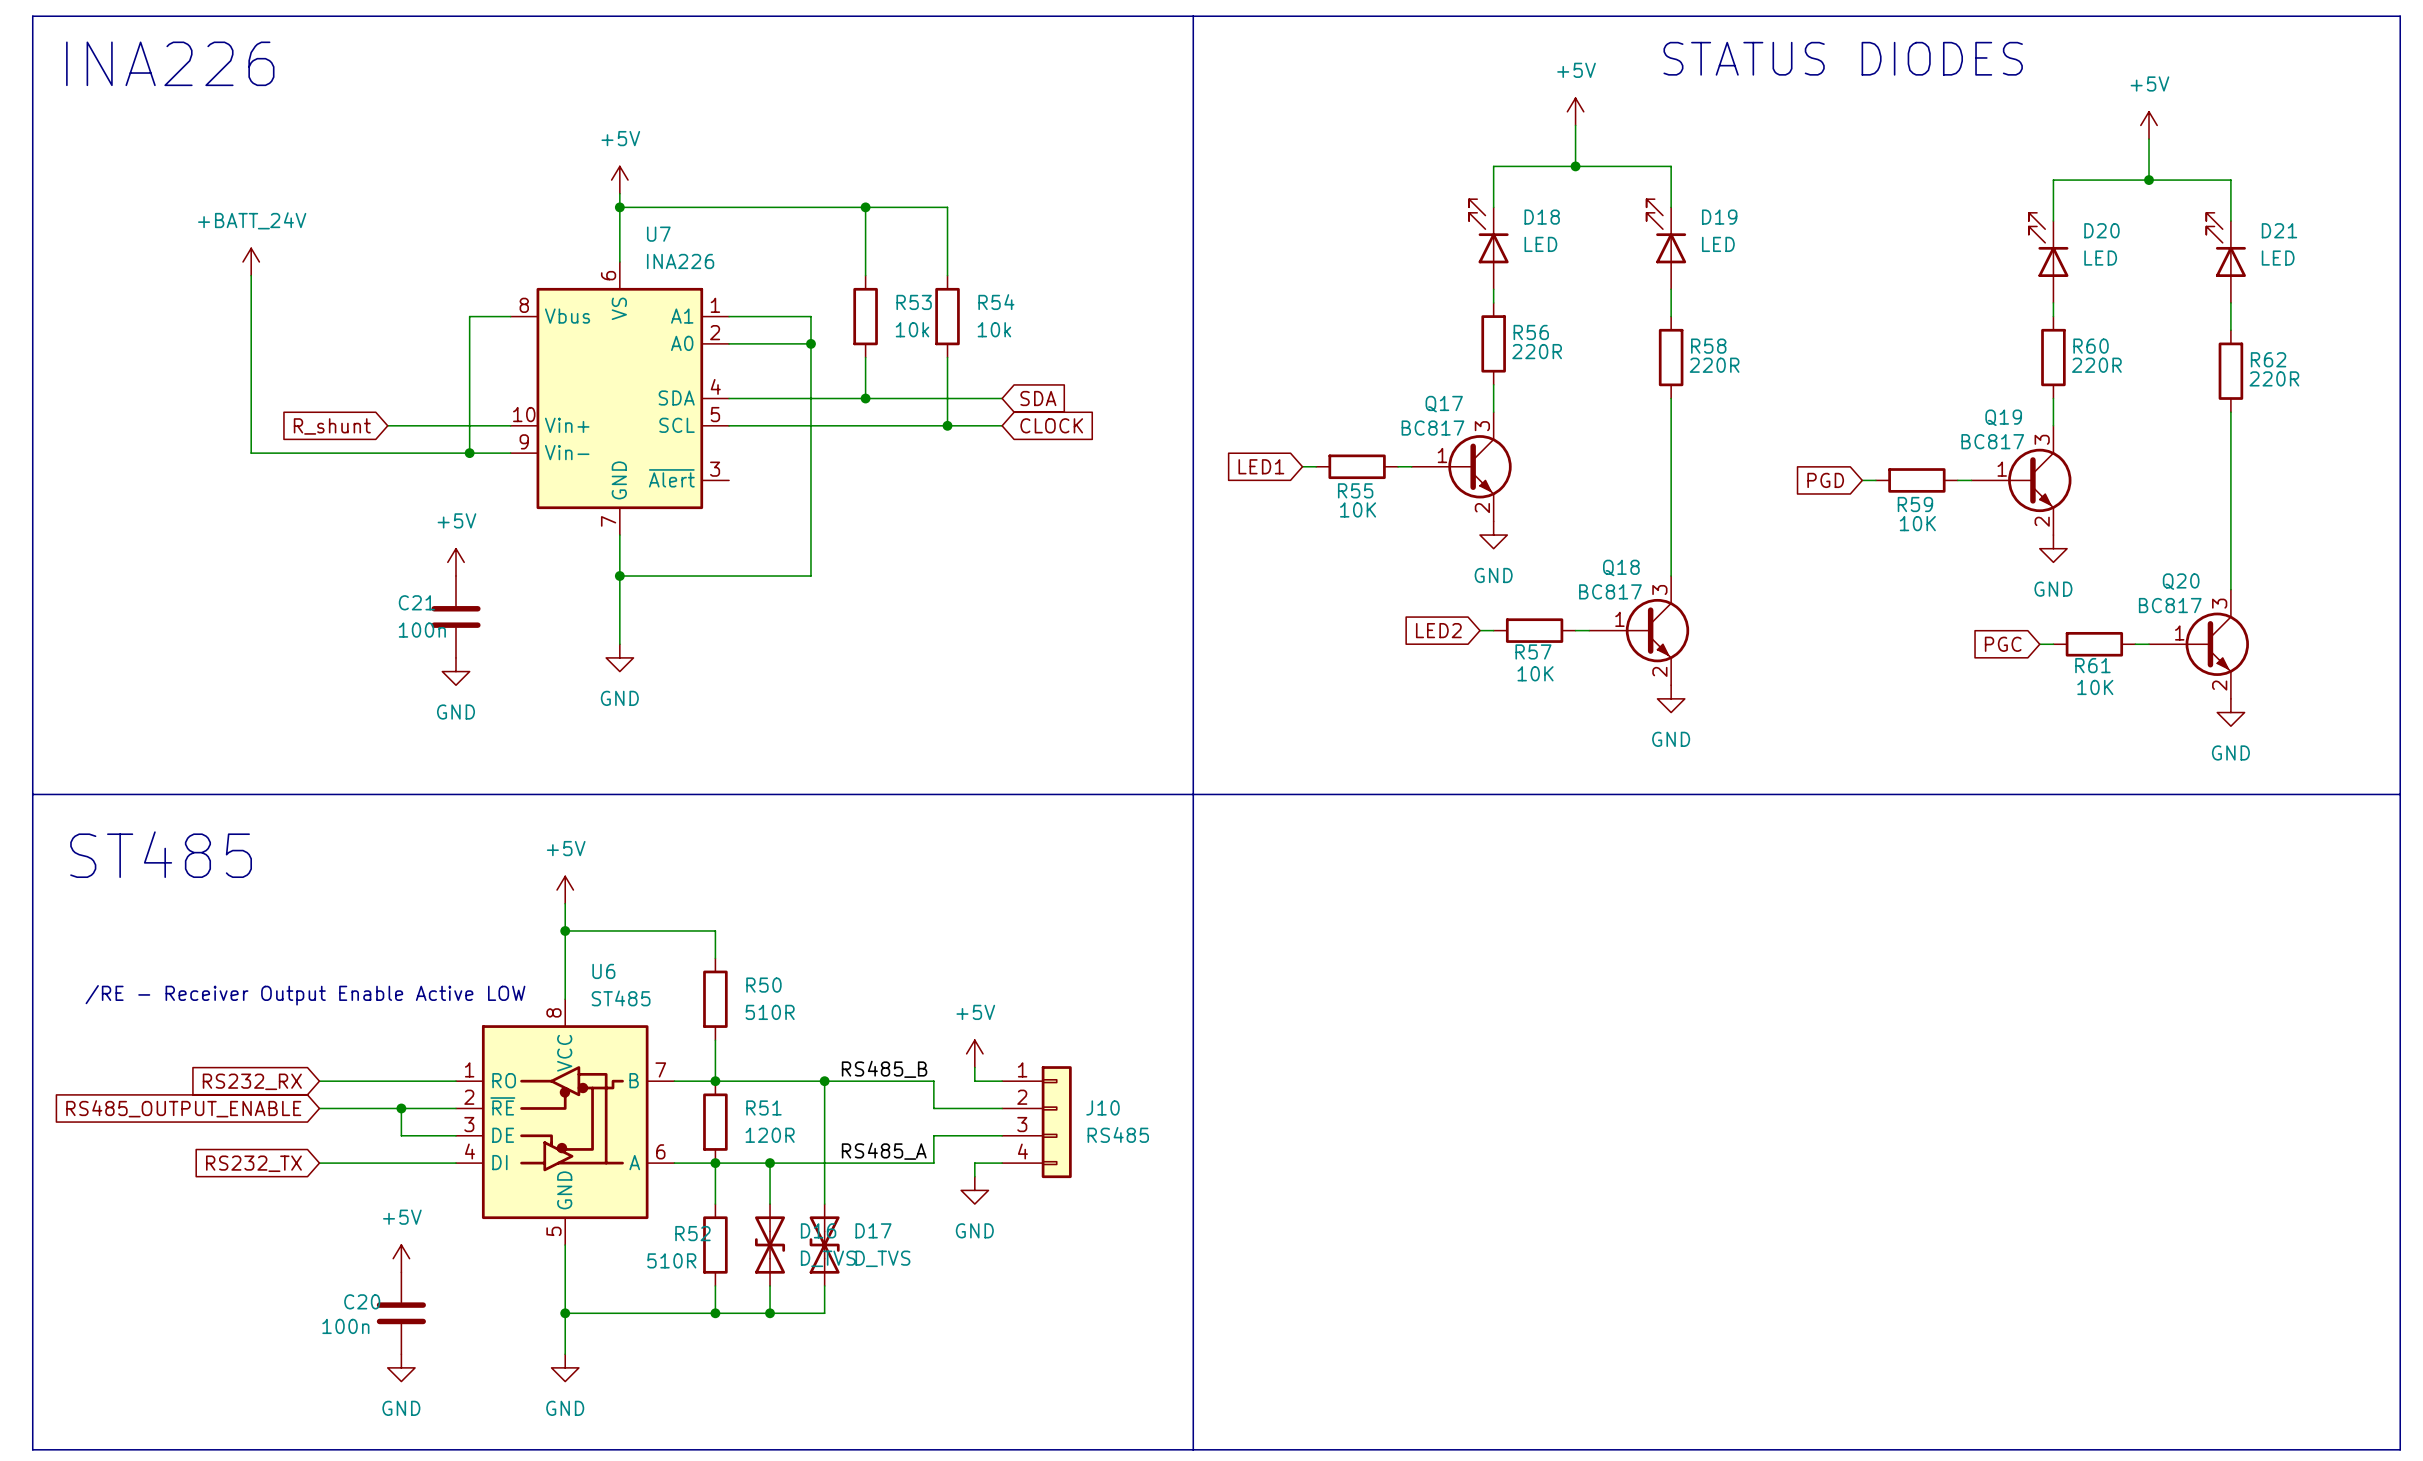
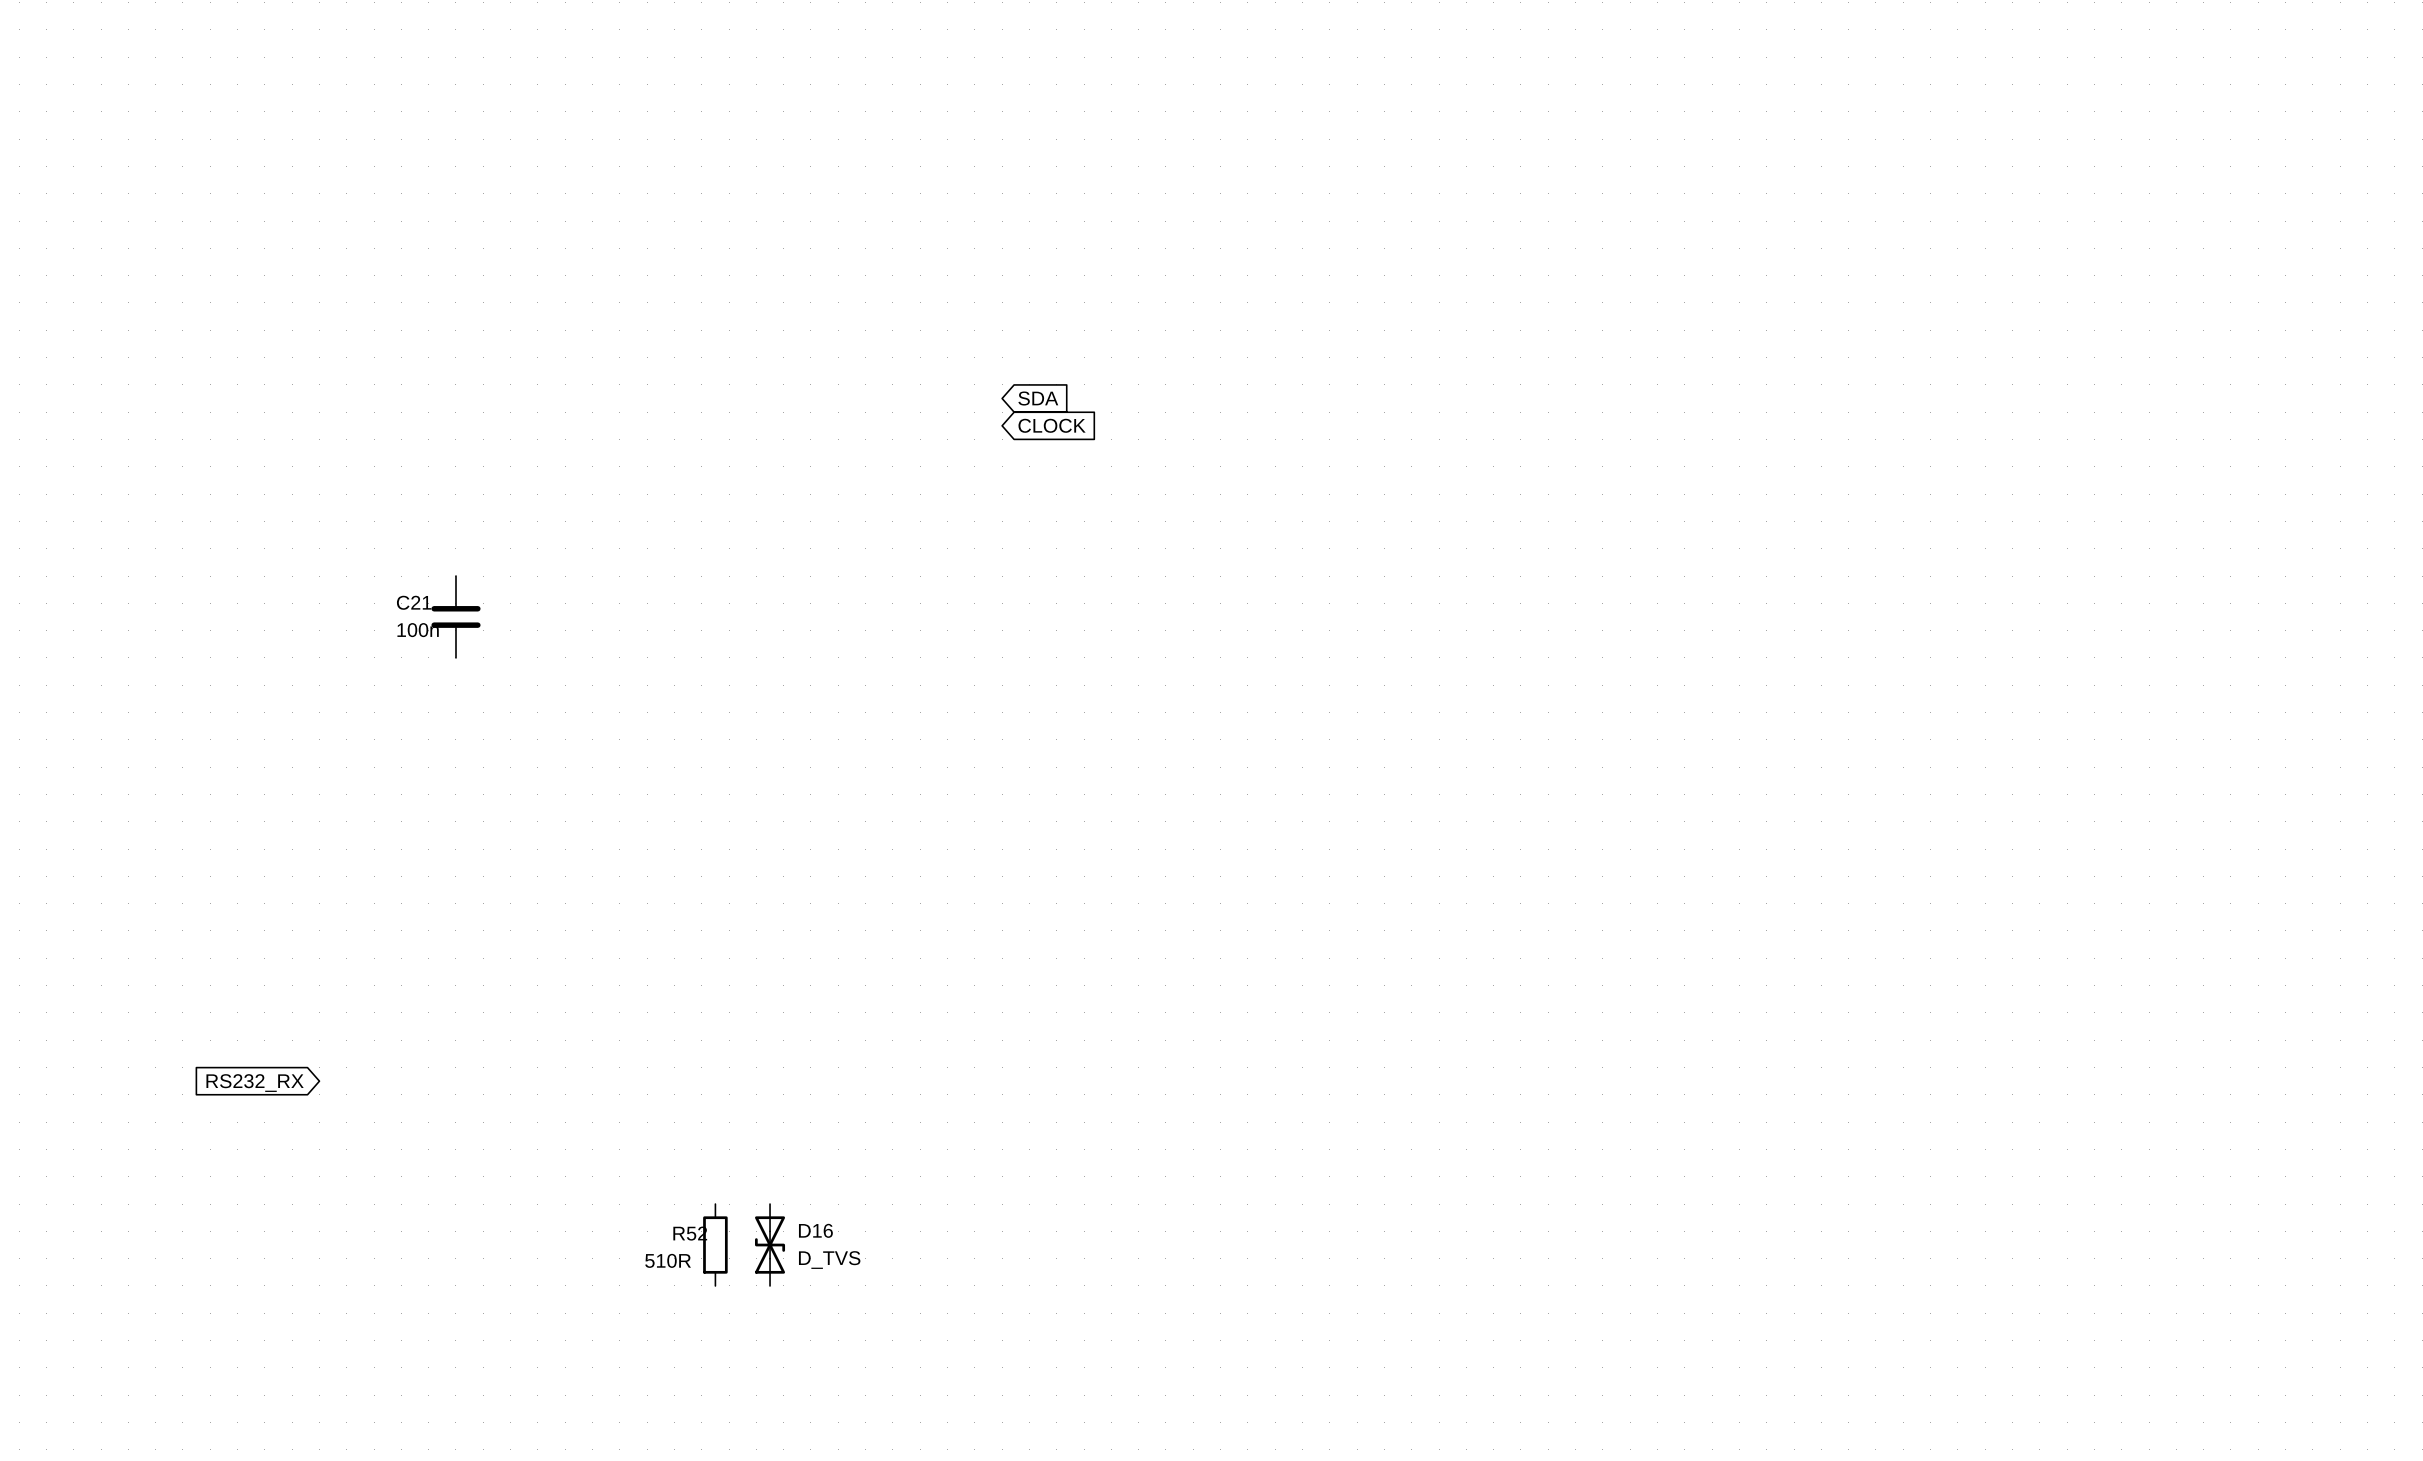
line: (32, 16) (32, 1449) (2400, 1449) (2400, 16) (32, 16) -> none
line: (1193, 16) (1193, 1449) -> none
text: STATUS DIODES (1843, 58) -> none
text: INA226 (170, 63) -> none
power symbol: +5V (1575, 111) -> none
wire: (1575, 125) (1575, 166) -> none
power symbol: +5V (2149, 125) -> none
wire: (2149, 139) (2149, 180) -> none
junction: (1575, 166) -> none
power symbol: +5V (619, 180) -> none
junction: (2149, 180) -> none
wire: (619, 193) (619, 261) -> none
wire: (619, 207) (947, 207) (947, 275) -> none
junction: (619, 207) -> none
wire: (865, 207) (865, 275) -> none
junction: (865, 207) -> none
wire: (1493, 207) (1493, 166) (1671, 166) (1671, 207) -> none
wire: (2053, 221) (2053, 180) (2230, 180) (2230, 221) -> none
D18: LED (1488, 244) -> none
D19: LED (1666, 244) -> none
D20: LED (2048, 257) -> none
D21: LED (2226, 257) -> none
power symbol: +BATT_24V (251, 261) -> none
wire: (251, 275) (251, 453) (510, 453) -> none
wire: (1493, 289) (1493, 302) -> none
wire: (1671, 289) (1671, 316) -> none
wire: (2053, 302) (2053, 316) -> none
wire: (2230, 302) (2230, 330) -> none
wire: (510, 316) (469, 316) (469, 453) -> none
wire: (729, 316) (810, 316) (810, 576) (619, 576) -> none
R53: 10k (865, 316) -> none
R54: 10k (947, 316) -> none
wire: (729, 343) (810, 343) -> none
junction: (810, 343) -> none
R56: 220R (1493, 343) -> none
wire: (865, 357) (865, 398) -> none
wire: (947, 357) (947, 425) -> none
R58: 220R (1671, 357) -> none
R60: 220R (2053, 357) -> none
R62: 220R (2230, 371) -> none
wire: (1493, 384) (1493, 412) -> none
U7: INA226 (619, 398) -> none
wire: (729, 398) (1002, 398) -> none
junction: (865, 398) -> none
wire: (1671, 398) (1671, 576) -> none
wire: (2053, 398) (2053, 425) -> none
wire: (2230, 412) (2230, 589) -> none
wire: (387, 425) (510, 425) -> none
wire: (729, 425) (1002, 425) -> none
junction: (947, 425) -> none
global label: R_shunt (332, 426) -> none
junction: (469, 453) -> none
global label: LED1 (1261, 466) -> none
wire: (1302, 466) (1316, 466) -> none
R55: 10K (1357, 466) -> none
wire: (1398, 466) (1411, 466) -> none
Q17: BC817 (1461, 466) -> none
global label: PGD (1825, 480) -> none
wire: (1862, 480) (1875, 480) -> none
R59: 10K (1916, 480) -> none
wire: (1957, 480) (1971, 480) -> none
Q19: BC817 (2021, 480) -> none
wire: (619, 535) (619, 644) -> none
power symbol: GND (1493, 535) -> none
power symbol: GND (2053, 548) -> none
power symbol: +5V (455, 562) -> none
junction: (619, 576) -> none
global label: LED2 (1438, 630) -> none
wire: (1479, 630) (1493, 630) -> none
R57: 10K (1534, 630) -> none
wire: (1575, 630) (1589, 630) -> none
Q18: BC817 (1639, 630) -> none
global label: PGC (2003, 644) -> none
wire: (2039, 644) (2053, 644) -> none
R61: 10K (2094, 644) -> none
wire: (2135, 644) (2149, 644) -> none
Q20: BC817 (2198, 644) -> none
power symbol: GND (619, 657) -> none
power symbol: GND (455, 671) -> none
power symbol: GND (1671, 698) -> none
power symbol: GND (2230, 712) -> none
line: (32, 794) (2400, 794) -> none
text: ST485 (161, 854) -> none
power symbol: +5V (565, 890) -> none
wire: (565, 903) (565, 999) -> none
wire: (565, 930) (715, 930) (715, 958) -> none
junction: (565, 930) -> none
text: /RE - Receiver Output Enable Active LOW (305, 995) -> none
R50: 510R (715, 999) -> none
wire: (715, 1040) (715, 1081) -> none
power symbol: +5V (974, 1053) -> none
wire: (974, 1067) (974, 1081) (1002, 1081) -> none
label: RS485_B (884, 1069) -> none
wire: (319, 1081) (455, 1081) -> none
wire: (674, 1081) (933, 1081) (933, 1108) (1002, 1108) -> none
junction: (715, 1081) -> none
wire: (824, 1081) (824, 1204) -> none
junction: (824, 1081) -> none
global label: RS485_OUTPUT_ENABLE (183, 1108) -> none
wire: (319, 1108) (455, 1108) -> none
wire: (401, 1108) (401, 1135) (455, 1135) -> none
junction: (401, 1108) -> none
U6: ST485 (565, 1122) -> none
R51: 120R (715, 1122) -> none
J10: RS485 (1036, 1122) -> none
wire: (1002, 1135) (933, 1135) (933, 1163) (674, 1163) -> none
label: RS485_A (884, 1151) -> none
global label: RS232_TX (253, 1163) -> none
wire: (319, 1163) (455, 1163) -> none
wire: (715, 1163) (715, 1204) -> none
junction: (715, 1163) -> none
wire: (770, 1163) (770, 1204) -> none
junction: (770, 1163) -> none
wire: (1002, 1163) (974, 1163) (974, 1176) -> none
power symbol: GND (974, 1190) -> none
wire: (565, 1245) (565, 1354) -> none
D17: D_TVS (824, 1245) -> none
power symbol: +5V (401, 1258) -> none
wire: (715, 1285) (715, 1313) -> none
wire: (770, 1285) (770, 1313) -> none
wire: (824, 1285) (824, 1313) (565, 1313) -> none
C20: 100n (401, 1313) -> none
junction: (565, 1313) -> none
junction: (715, 1313) -> none
junction: (770, 1313) -> none
power symbol: GND (401, 1367) -> none
power symbol: GND (565, 1367) -> none

